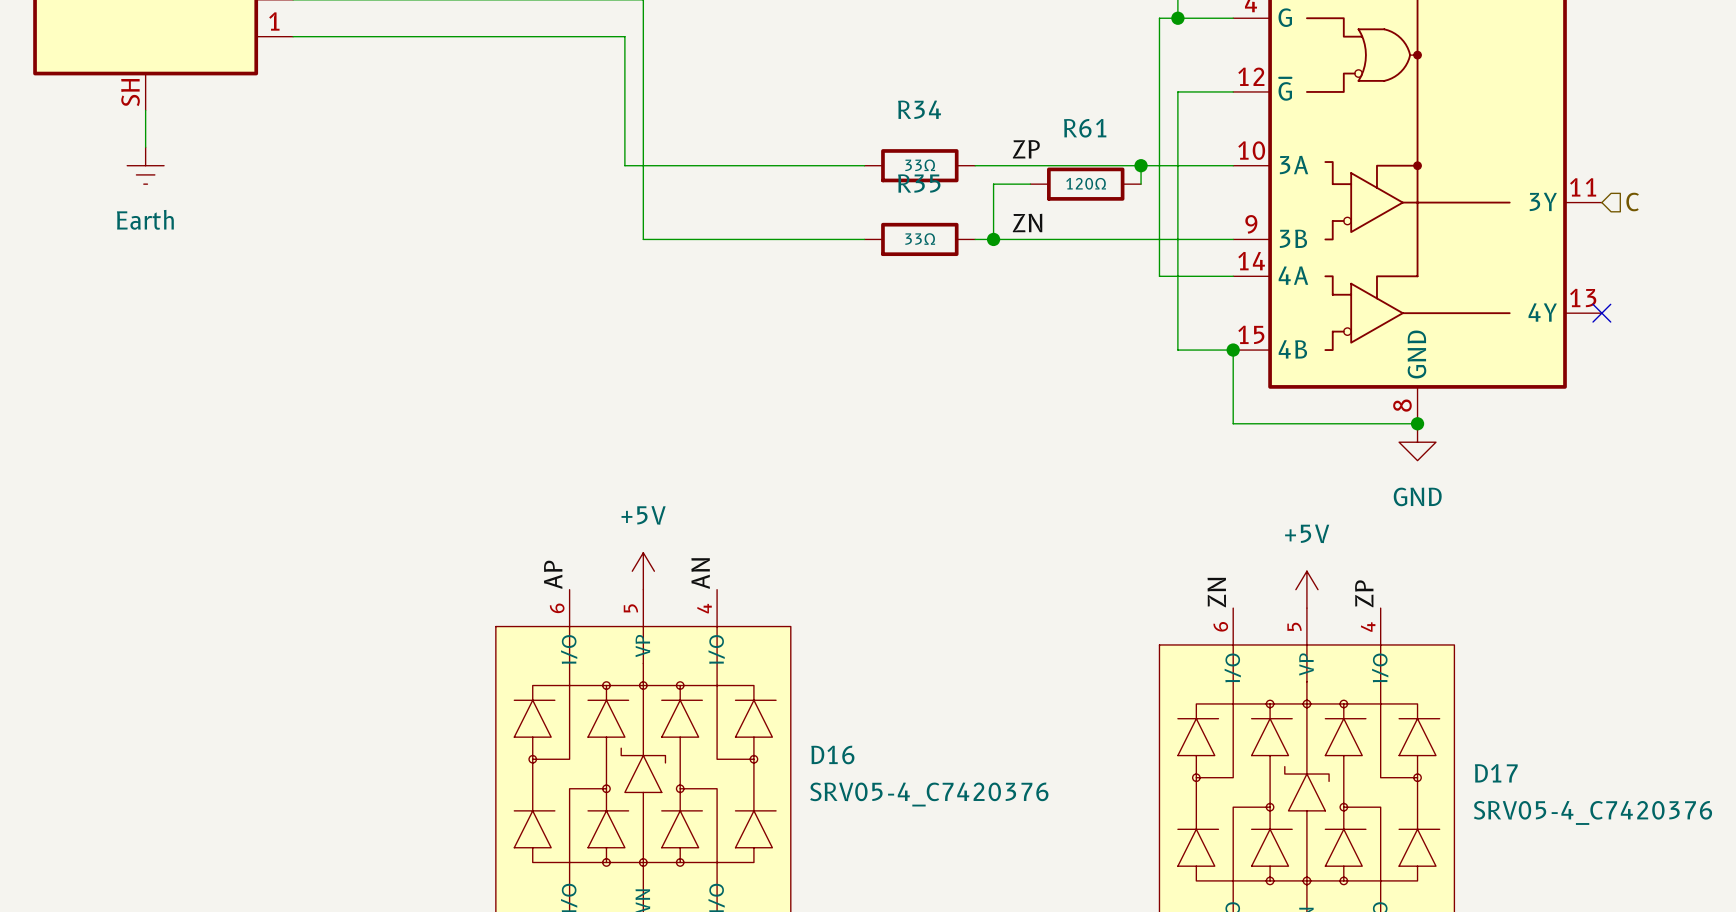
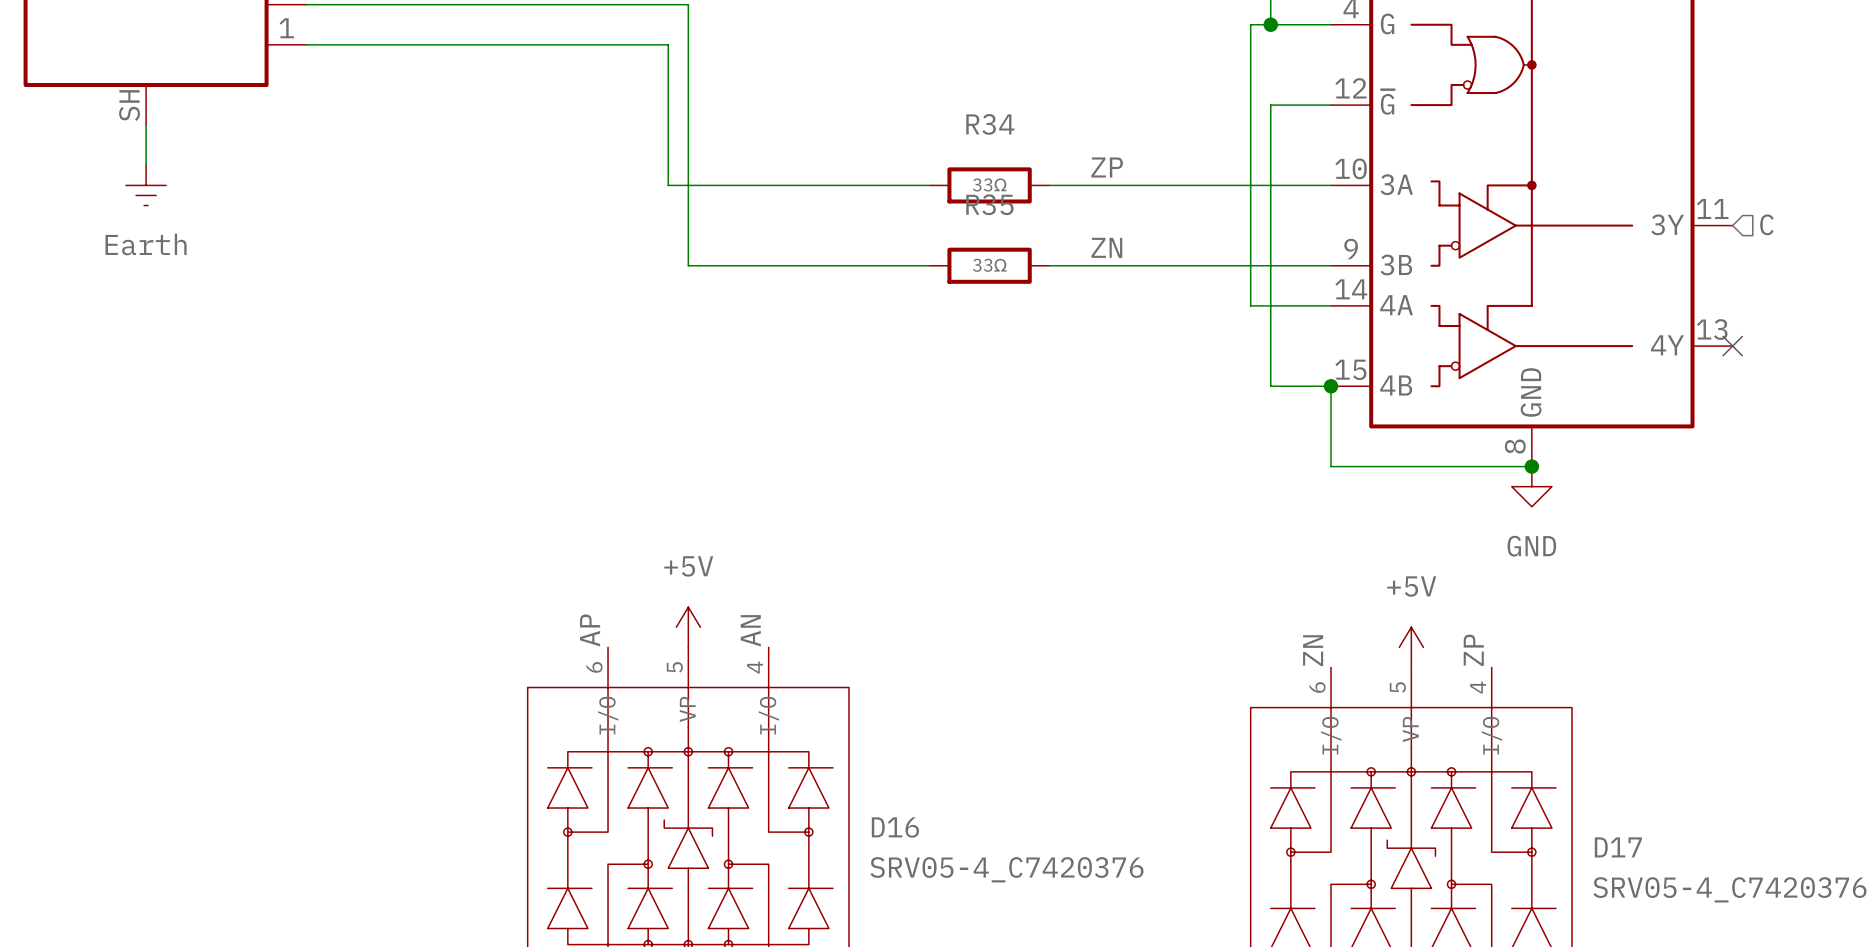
wire: (1141, 165) (1141, 184) -> none
junction: (1141, 165) -> none
wire: (1030, 184) (993, 184) (993, 239) -> none
R61: 120Ω (1085, 184) -> none
junction: (993, 239) -> none

